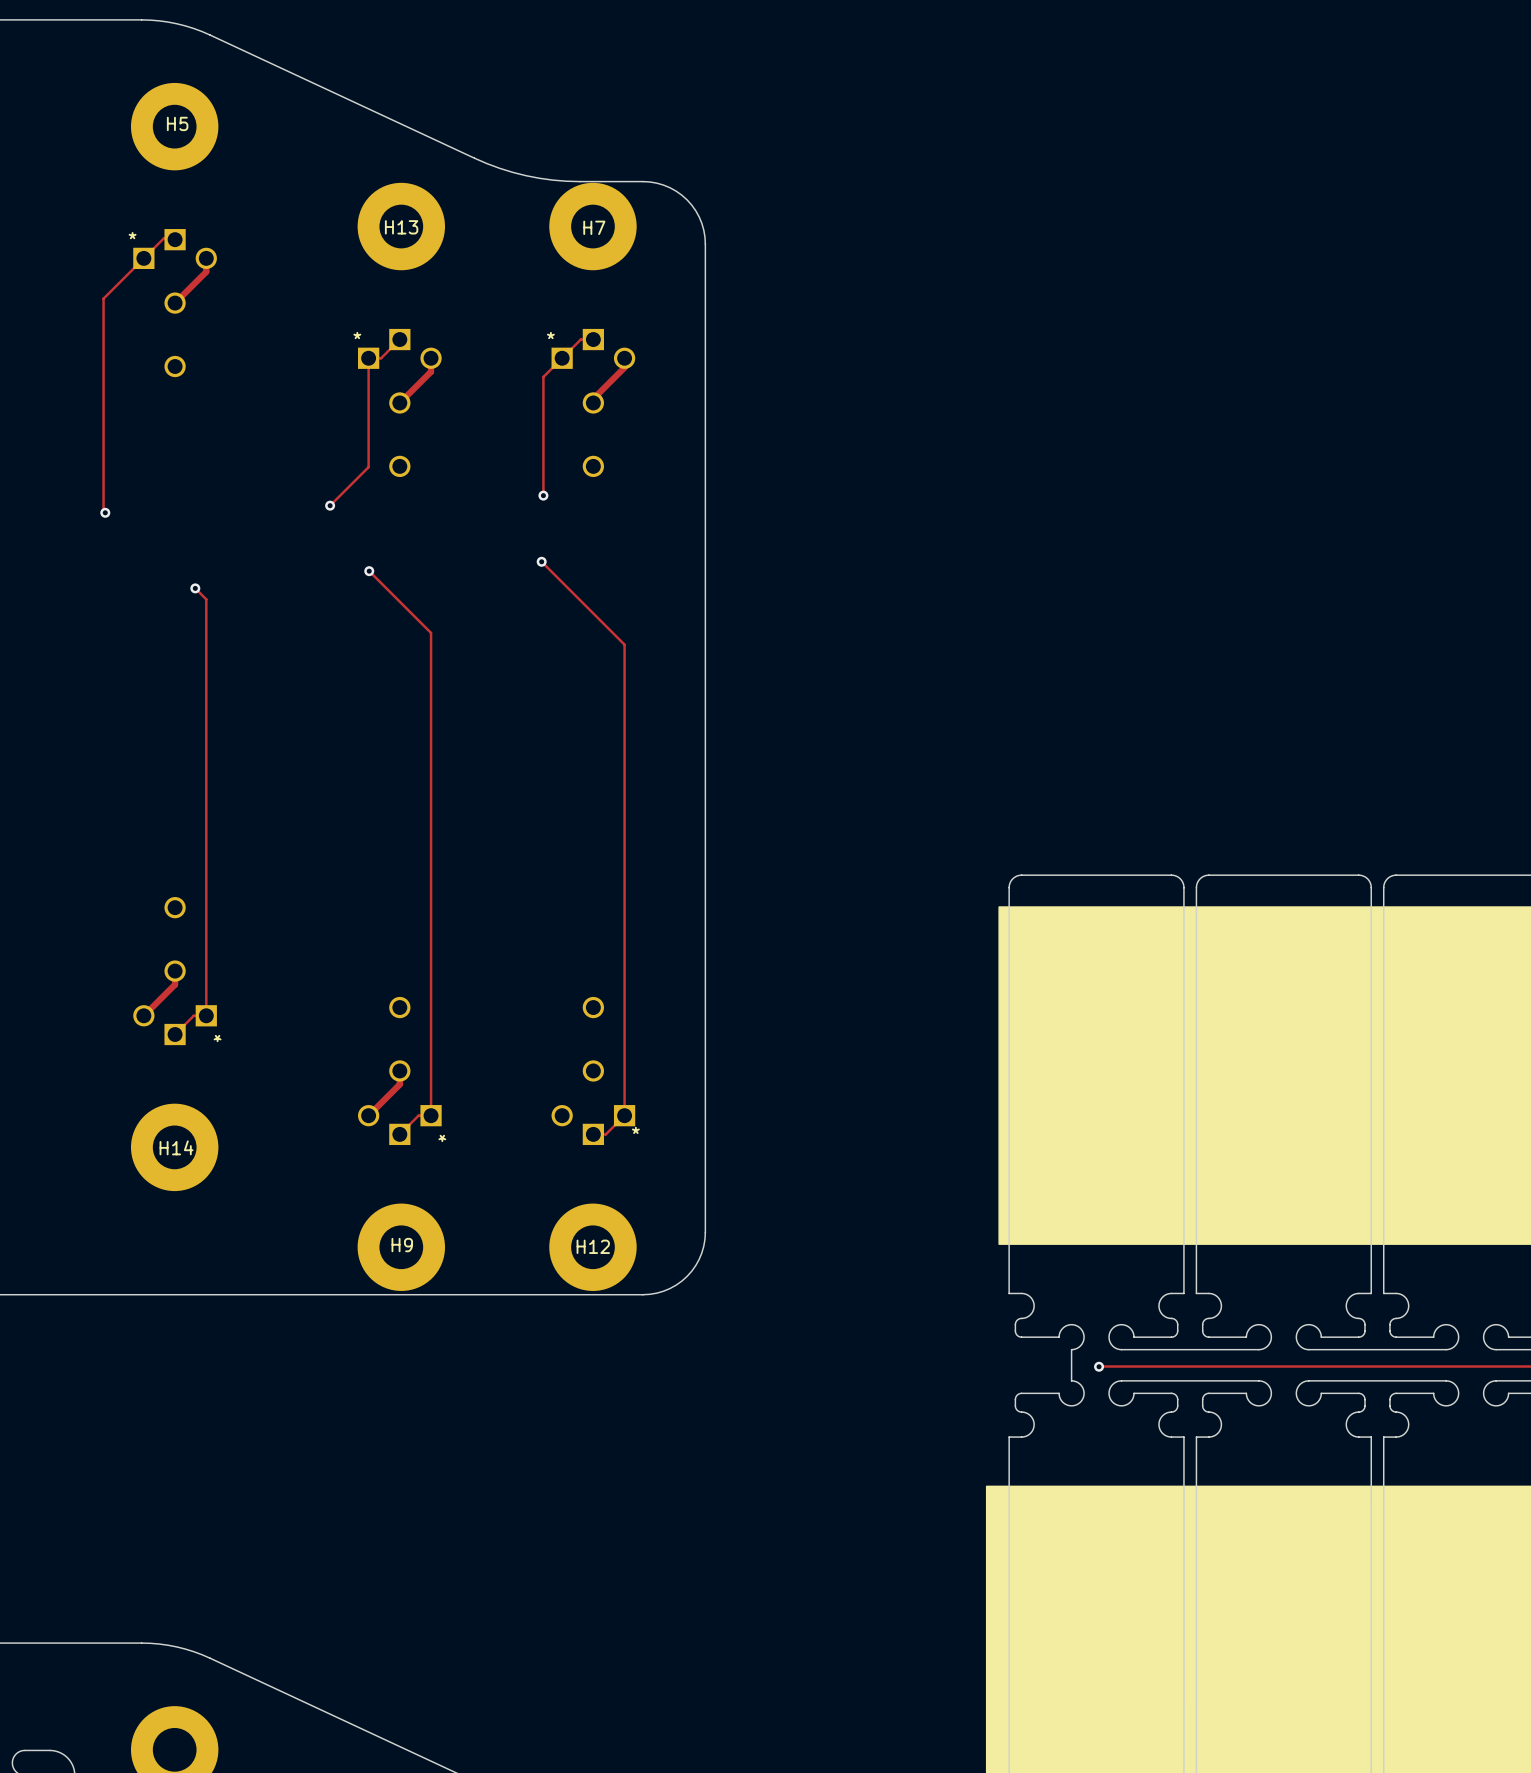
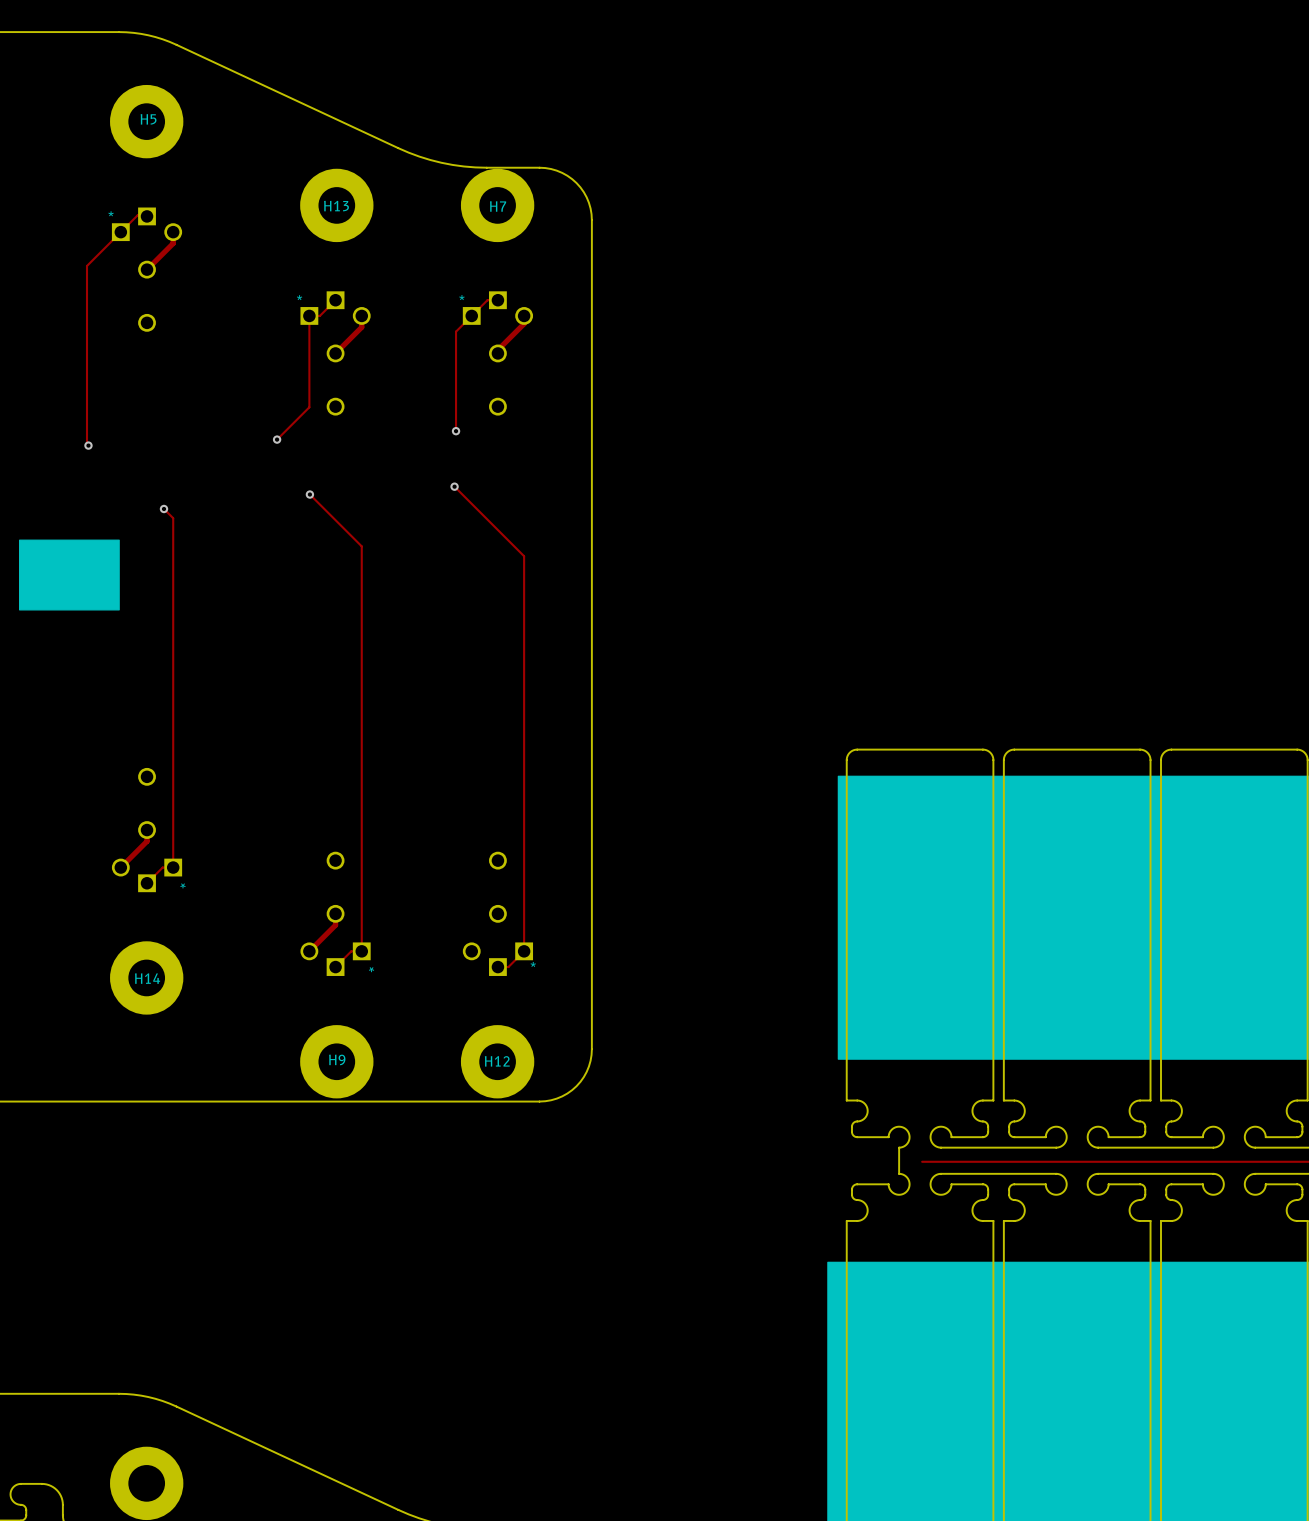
drawing: none -> [19, 539, 120, 611]
via: (1099, 1366) -> none

